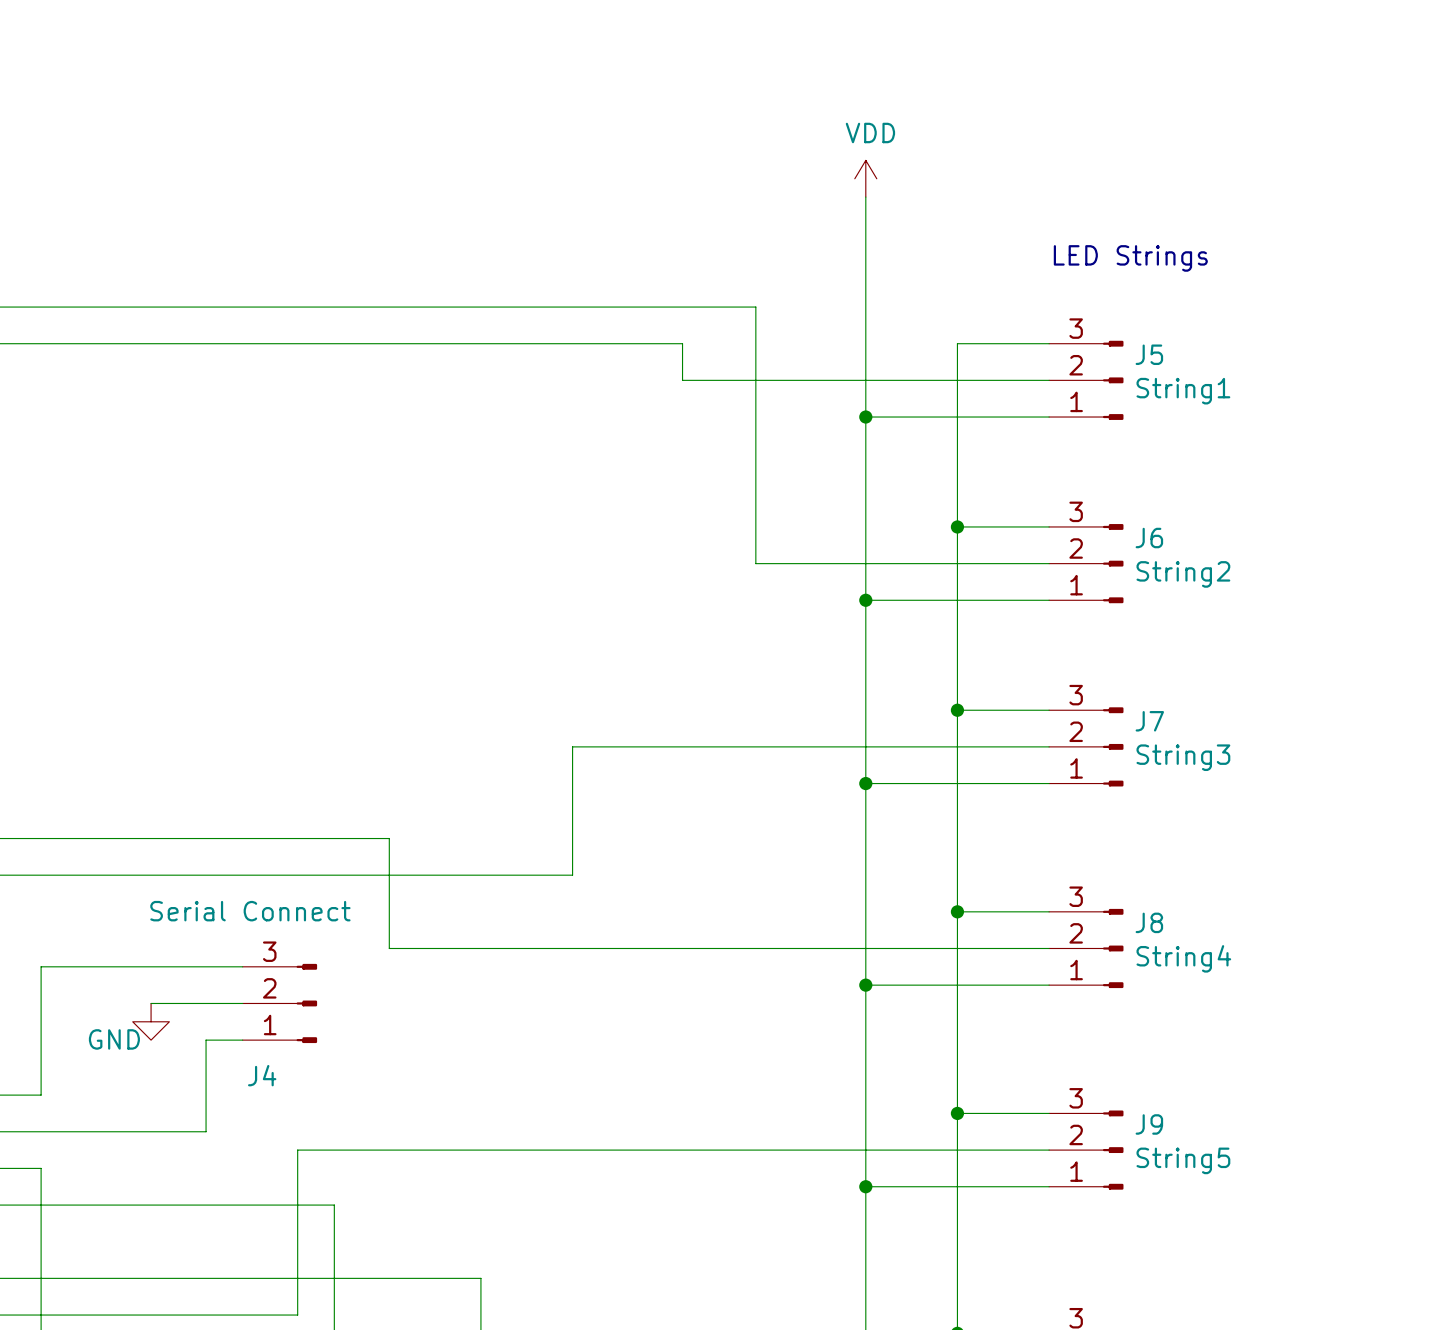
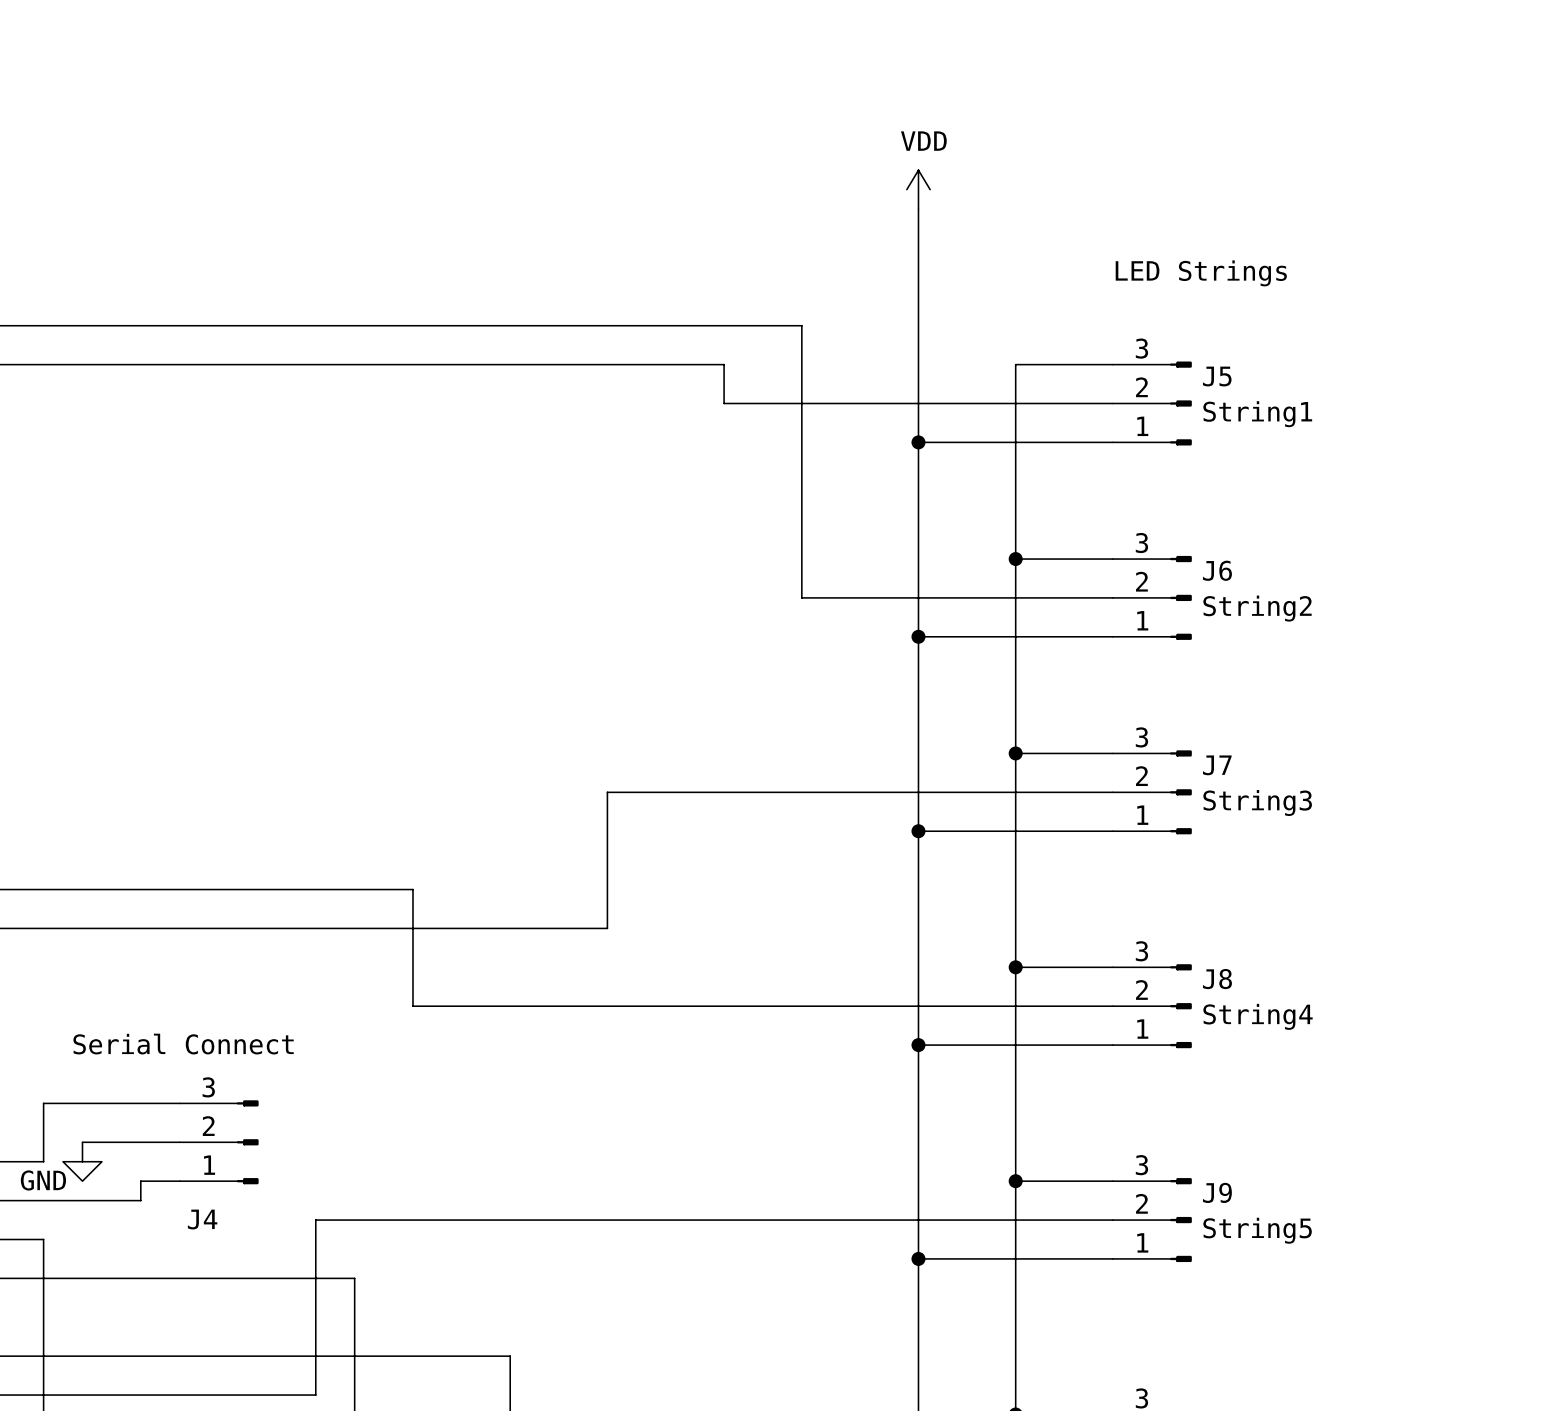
wire: (242, 966) (41, 966) (41, 1040) -> (179, 1103) (43, 1103)
wire: (151, 1003) (242, 1003) -> (82, 1142) (179, 1142)
J4 position: (279, 1003) -> (219, 1142)
power symbol position: GND (151, 1021) -> GND (82, 1161)
wire: (242, 1040) (206, 1040) (206, 1131) (132, 1131) -> (179, 1181) (140, 1181) (140, 1200)

